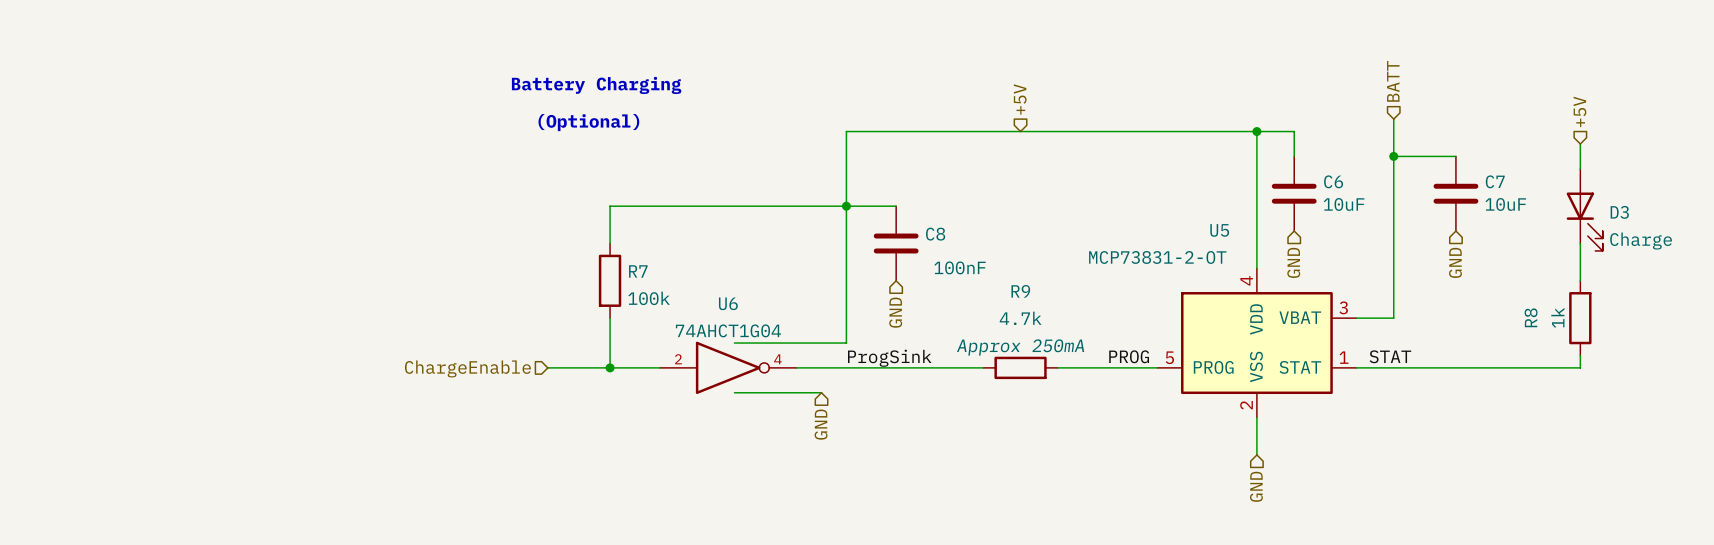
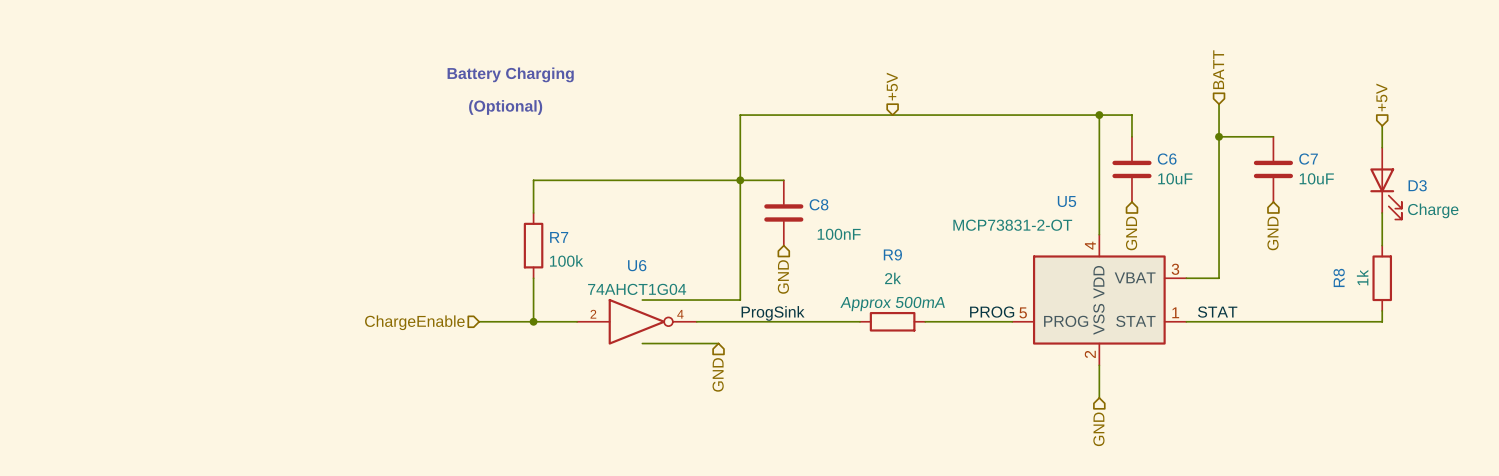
R9 value: 4.7k (1020, 318) -> 2k (893, 278)
R9 text: Approx 250mA (1020, 347) -> Approx 500mA (892, 304)

